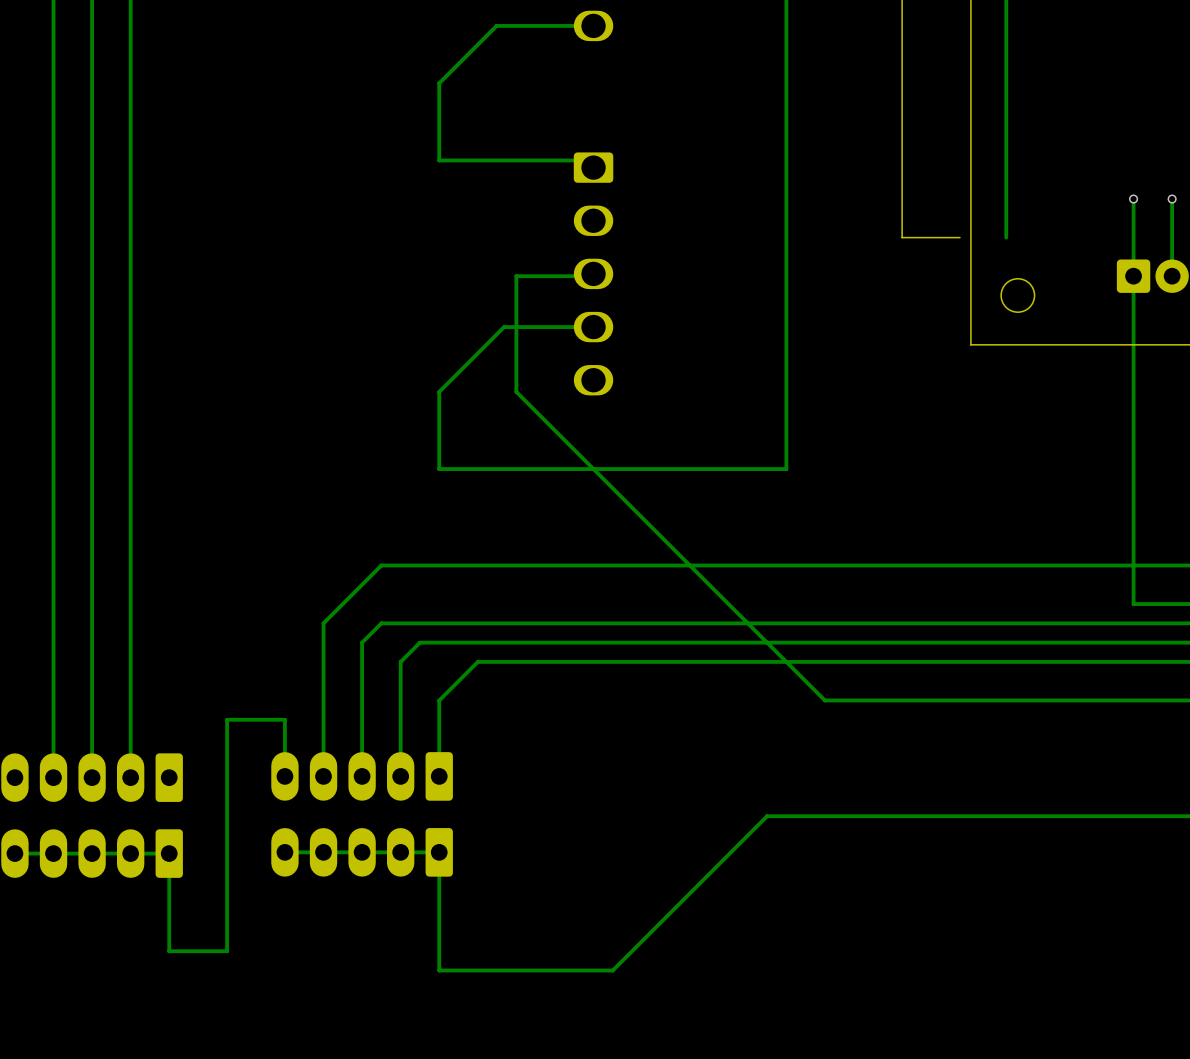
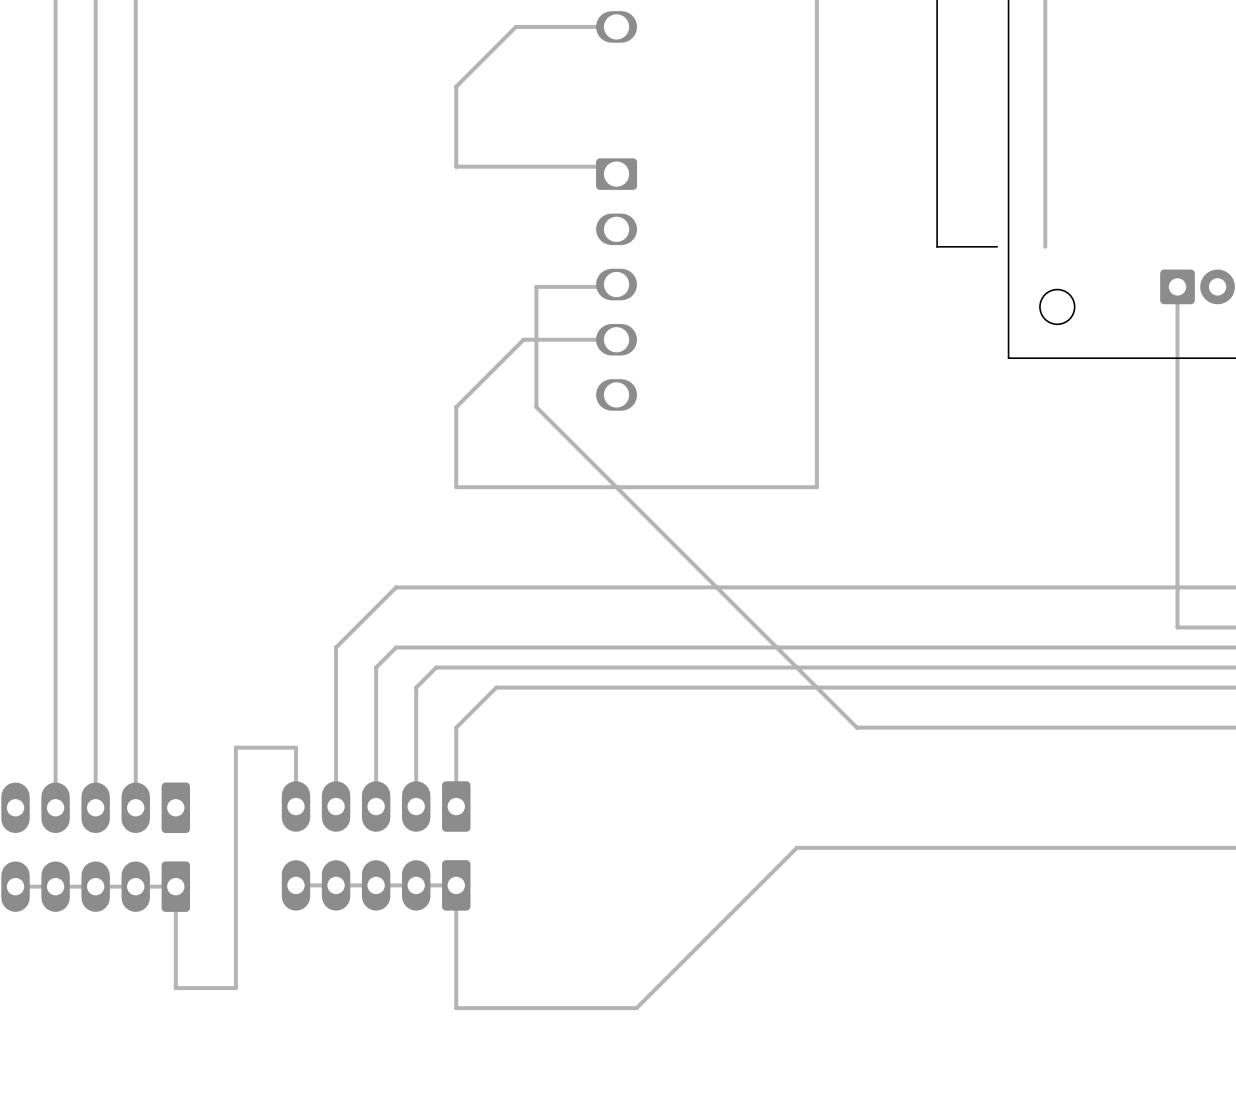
track: (1133, 199) (1133, 276) -> none
via: (1133, 199) -> none
track: (1172, 199) (1172, 276) -> none
via: (1172, 199) -> none

